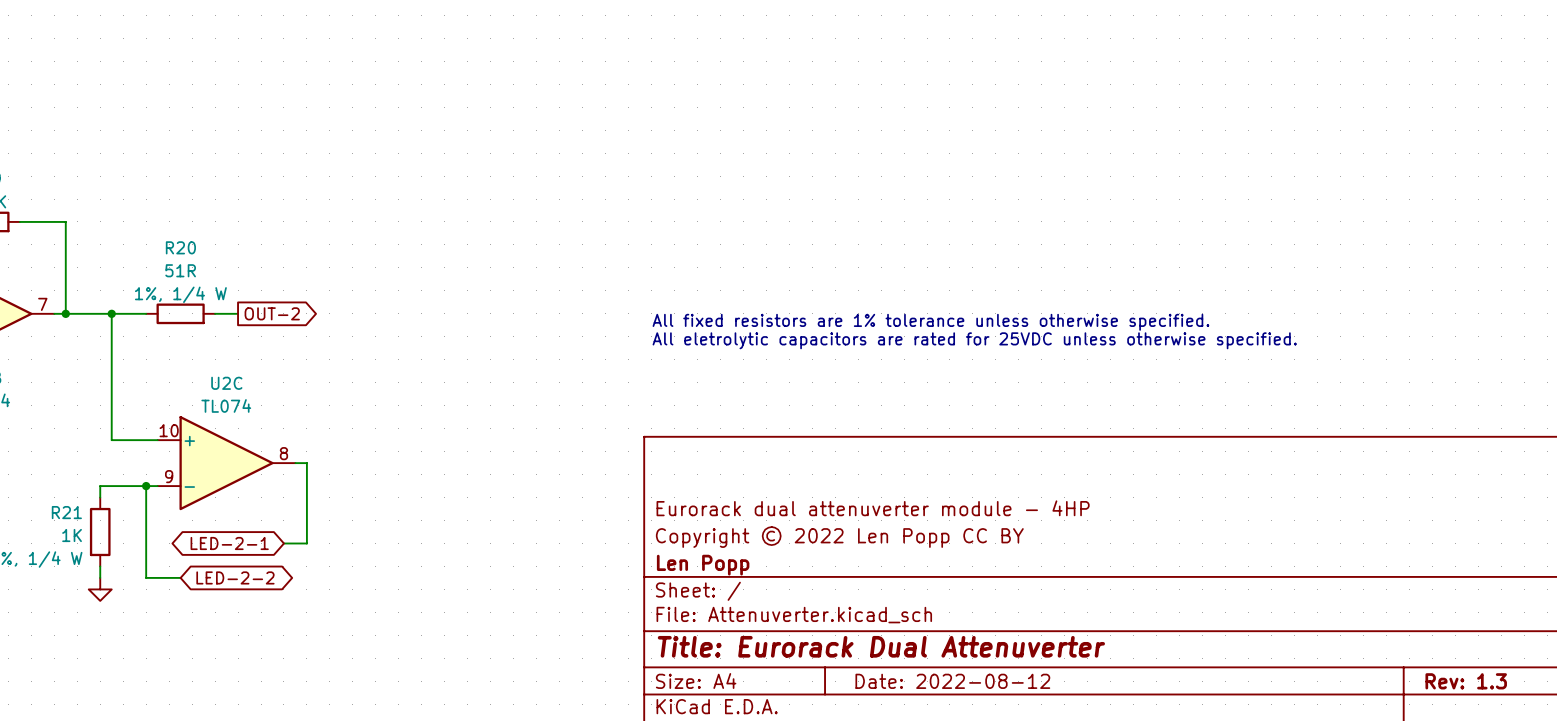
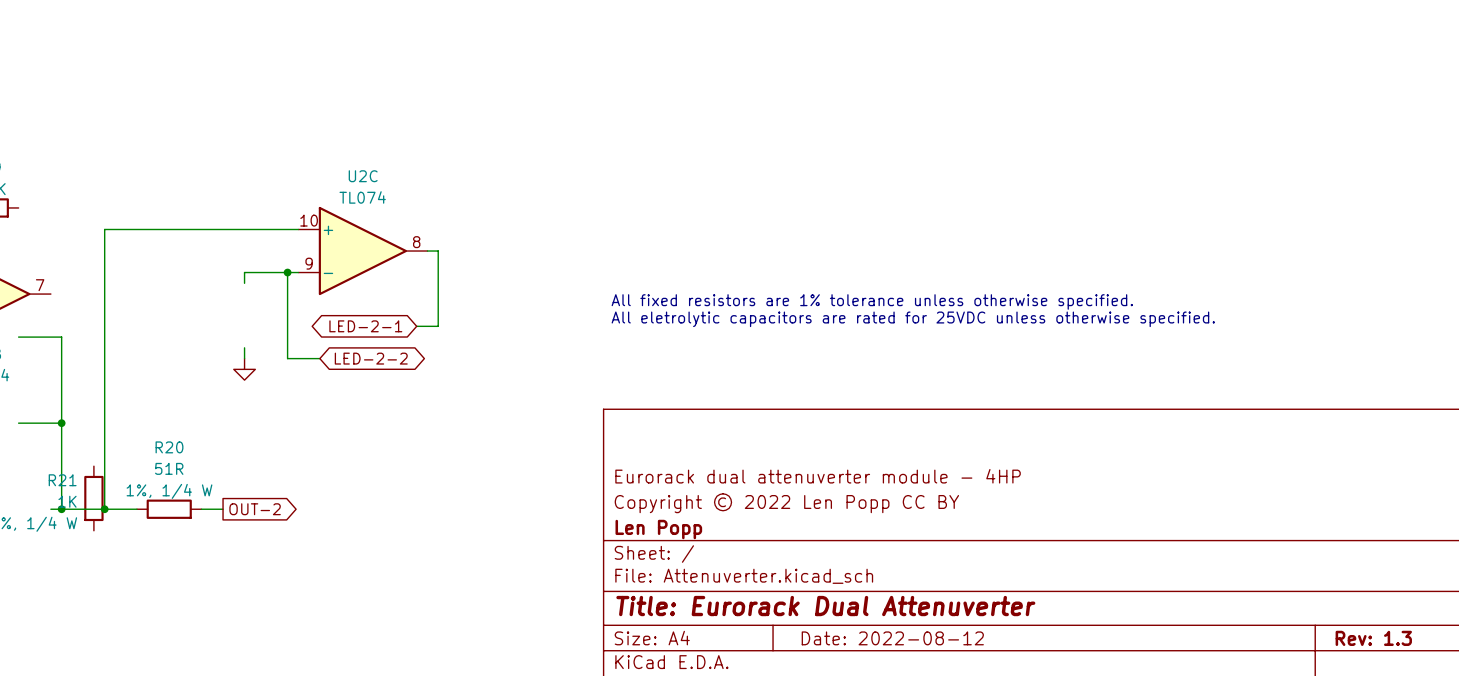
wire: (19, 221) (65, 221) (65, 313) -> none
wire: none -> (298, 229) (104, 229) (104, 294)
wire: none -> (427, 251) (438, 251) (438, 326) (416, 326)
wire: none -> (287, 272) (287, 358) (319, 358)
junction: none -> (287, 272)
wire: none -> (298, 272) (244, 272) (244, 283)
wire: (54, 313) (146, 313) -> none
junction: (65, 313) -> none
junction: (111, 313) -> none
R20 position: (180, 313) -> (169, 509)
wire: (215, 313) (238, 313) -> none
global label: OUT-2 (272, 313) -> none
global label: none -> LED-2-1 (365, 326)
wire: none -> (18, 337) (61, 337) (61, 509)
wire: none -> (244, 347) (244, 358)
global label: none -> LED-2-2 (371, 358)
power symbol: none -> (244, 369)
wire: (111, 440) (157, 440) -> (104, 412) (104, 509)
wire: none -> (18, 423) (61, 423)
junction: none -> (61, 423)
U2C position: (226, 463) -> (362, 251)
wire: (295, 463) (306, 463) (306, 543) (283, 543) -> none
wire: (146, 486) (146, 577) (180, 577) -> none
junction: (146, 486) -> none
wire: (157, 486) (100, 486) (100, 497) -> none
wire: none -> (50, 509) (136, 509)
junction: none -> (61, 509)
junction: none -> (104, 509)
wire: none -> (201, 509) (223, 509)
global label: LED-2-1 (229, 543) -> none
global label: none -> OUT-2 (255, 509)
wire: (100, 566) (100, 577) -> none
global label: LED-2-2 (235, 577) -> none
power symbol: (100, 589) -> none

